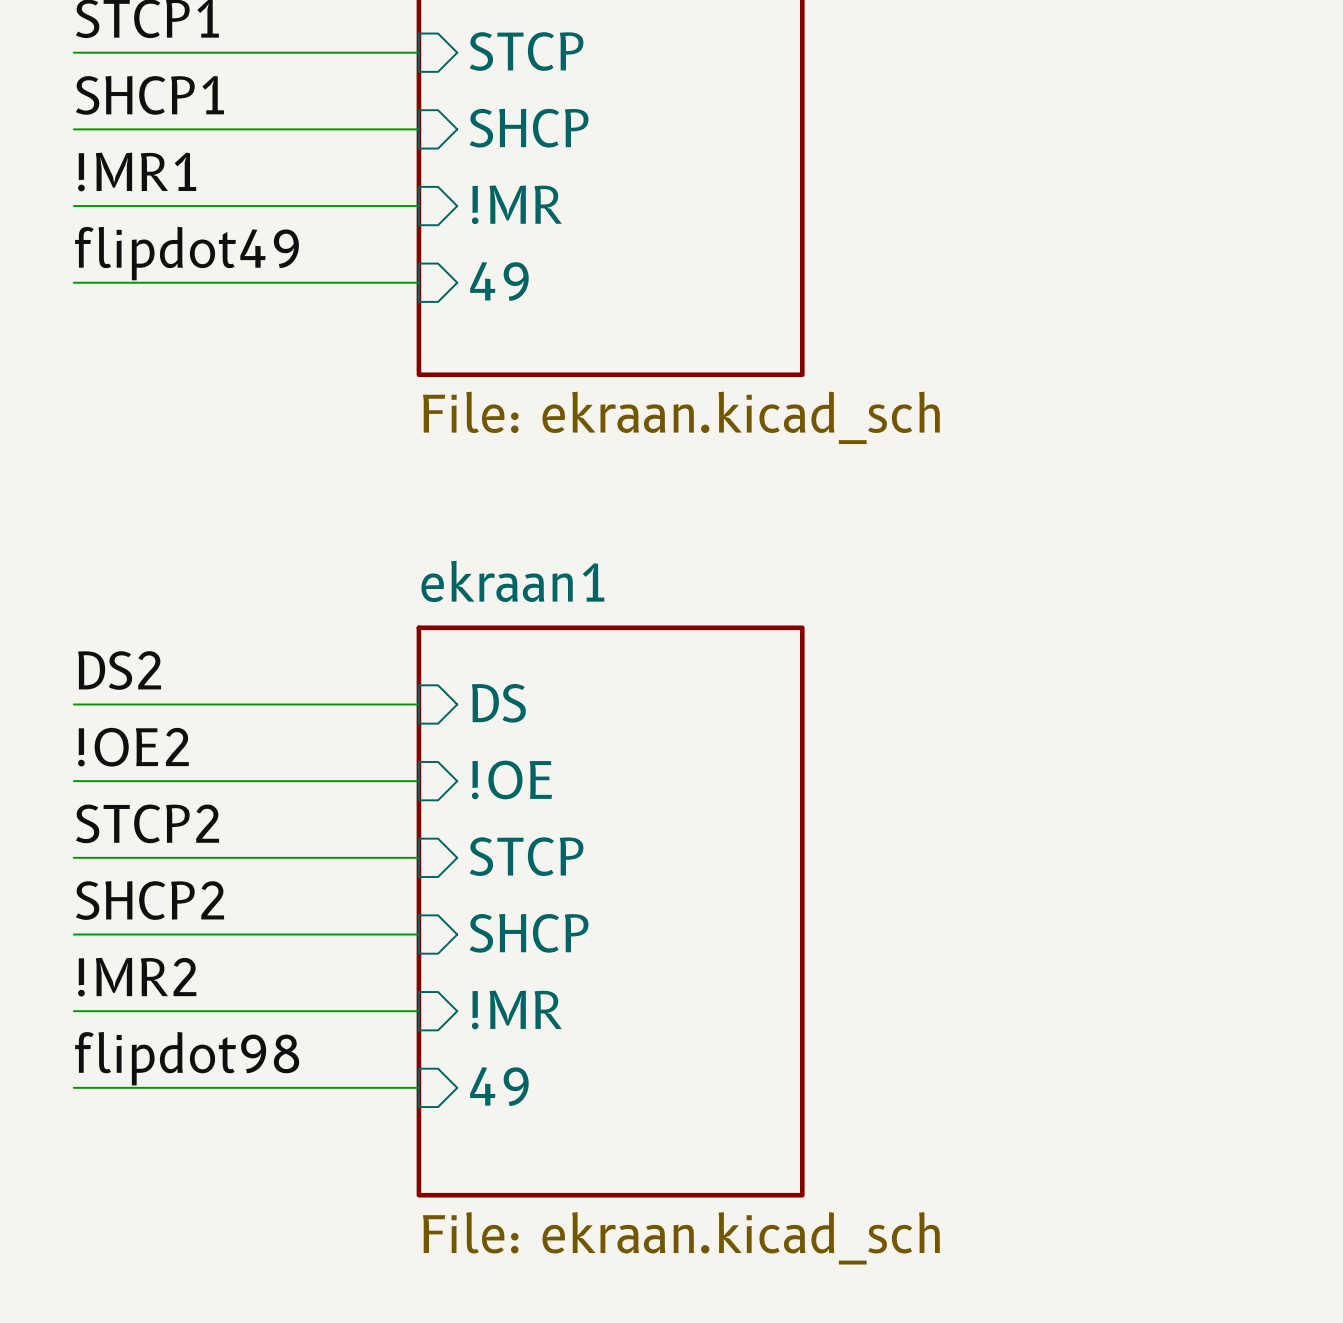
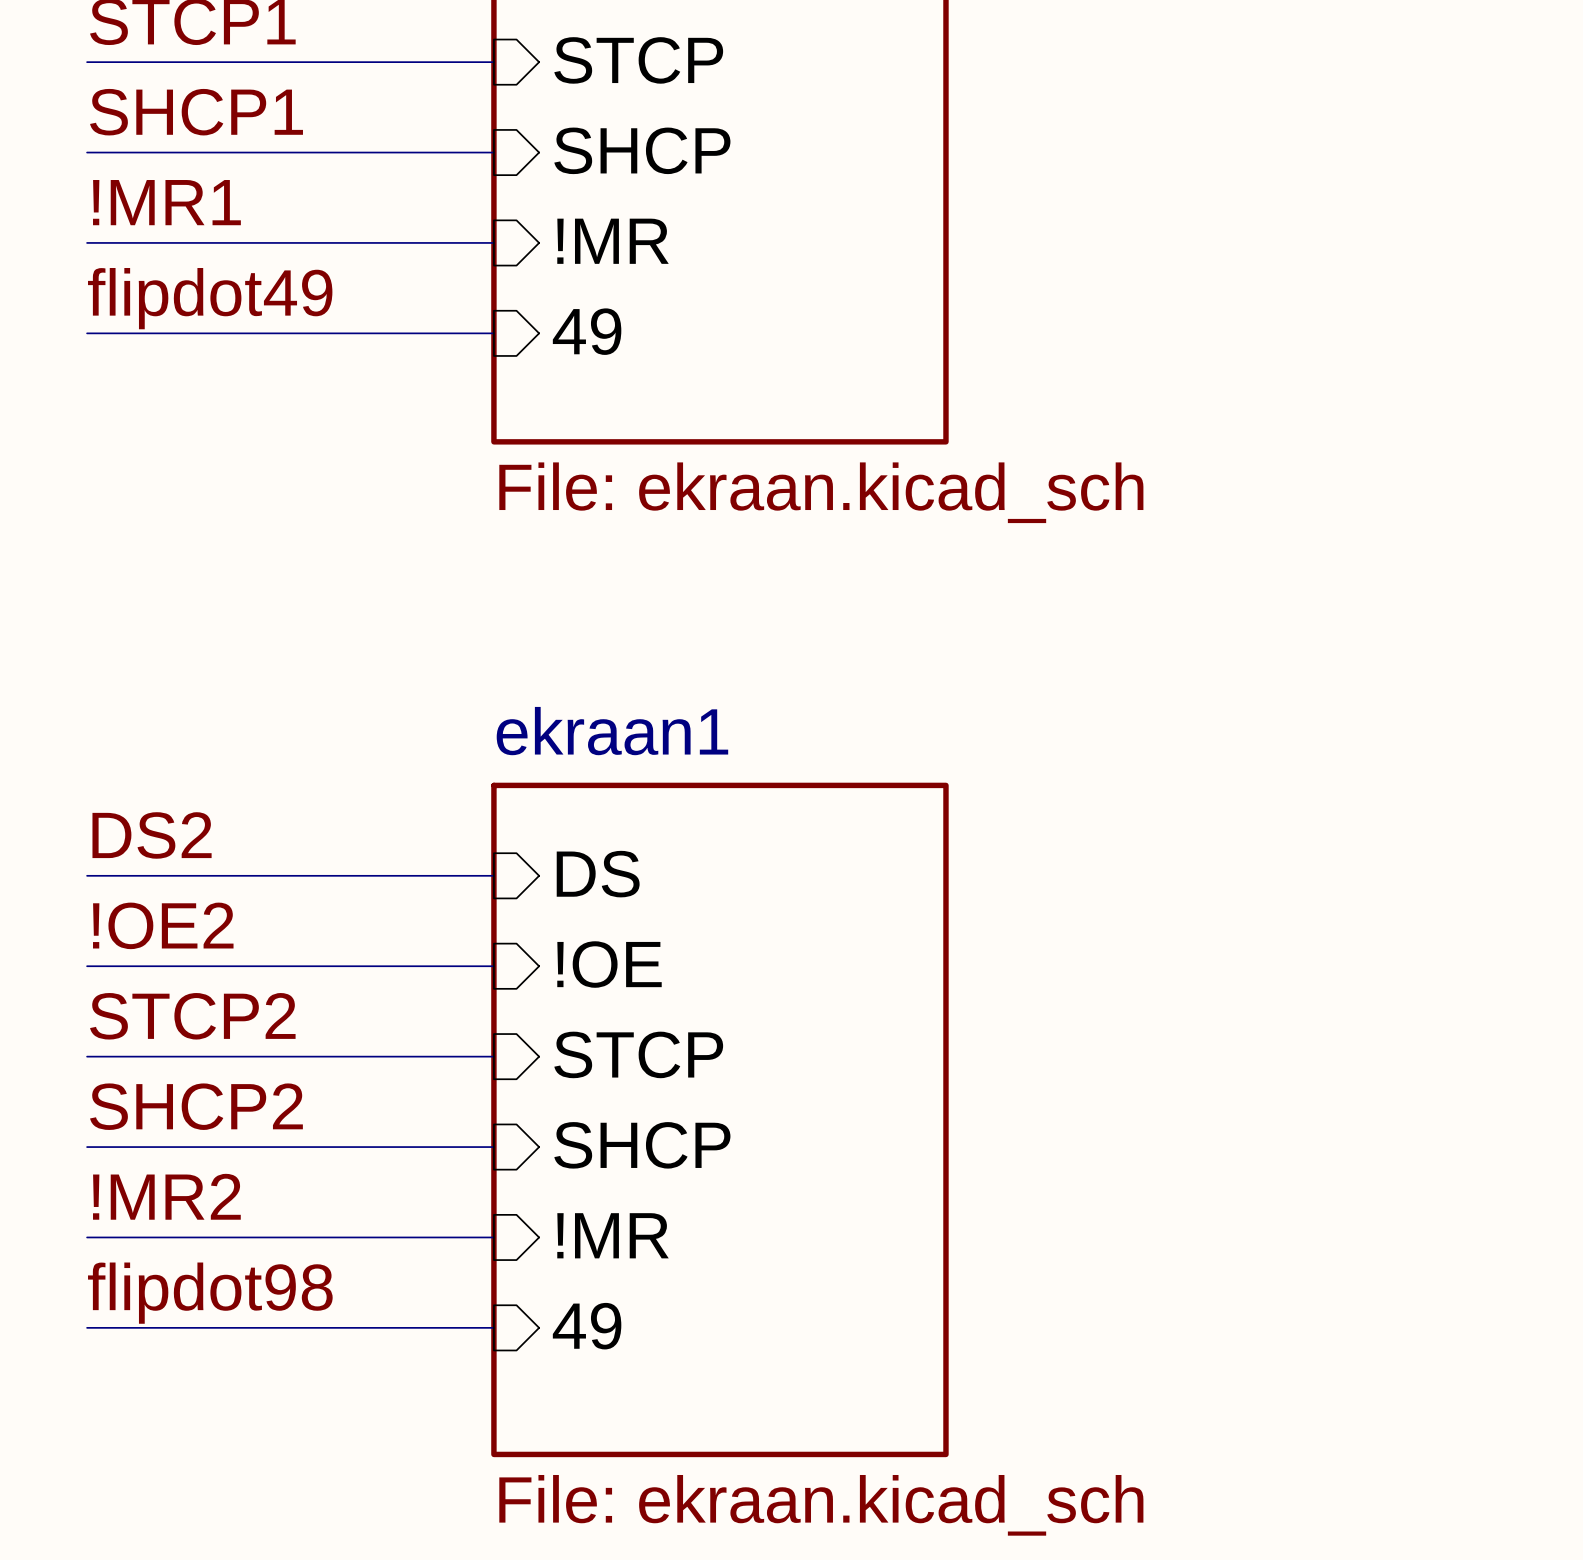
label position: DS2 (119, 670) -> DS2 (152, 835)
sheet pin position: DS (498, 703) -> DS (598, 874)
wire: (73, 704) (418, 704) -> (87, 875) (493, 875)
label position: !OE2 (133, 747) -> !OE2 (163, 925)
sheet pin position: !OE (511, 779) -> !OE (609, 964)
wire: (73, 781) (418, 781) -> (87, 966) (493, 966)
label position: STCP2 (147, 823) -> STCP2 (192, 1016)
sheet pin position: STCP (526, 856) -> STCP (638, 1054)
wire: (73, 857) (418, 857) -> (87, 1056) (493, 1056)
label position: SHCP2 (150, 900) -> SHCP2 (196, 1106)
sheet ekraan1 position: (610, 911) -> (719, 1119)
sheet pin position: SHCP (529, 933) -> SHCP (642, 1145)
wire: (73, 934) (418, 934) -> (87, 1147) (493, 1147)
label position: !MR2 (137, 977) -> !MR2 (166, 1196)
sheet pin position: !MR (516, 1009) -> !MR (613, 1235)
wire: (73, 1011) (418, 1011) -> (87, 1237) (493, 1237)
label position: flipdot98 (187, 1058) -> flipdot98 (210, 1293)
sheet pin position: 49 (499, 1086) -> 49 (587, 1326)
wire: (73, 1087) (418, 1087) -> (87, 1327) (493, 1327)

